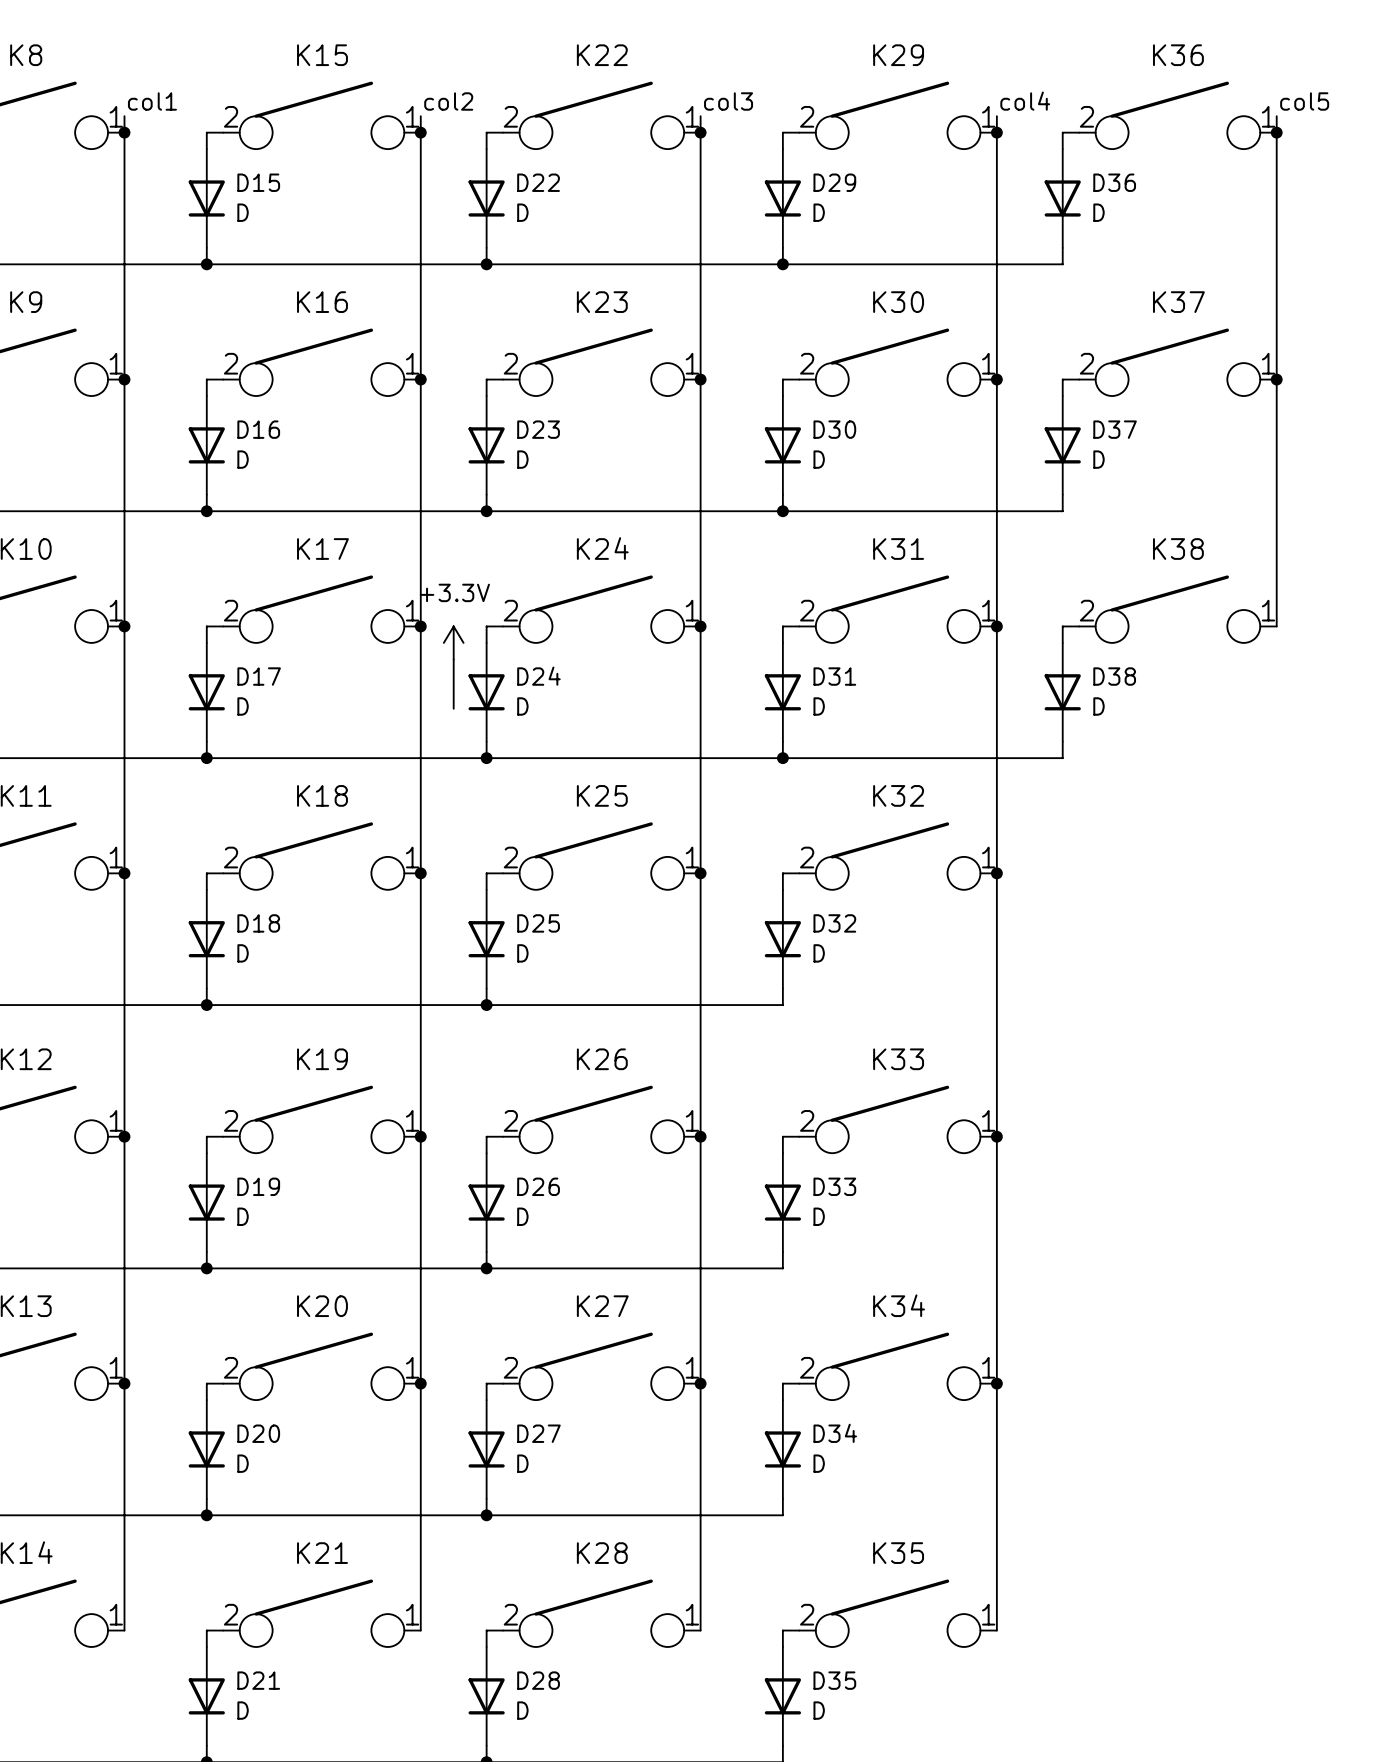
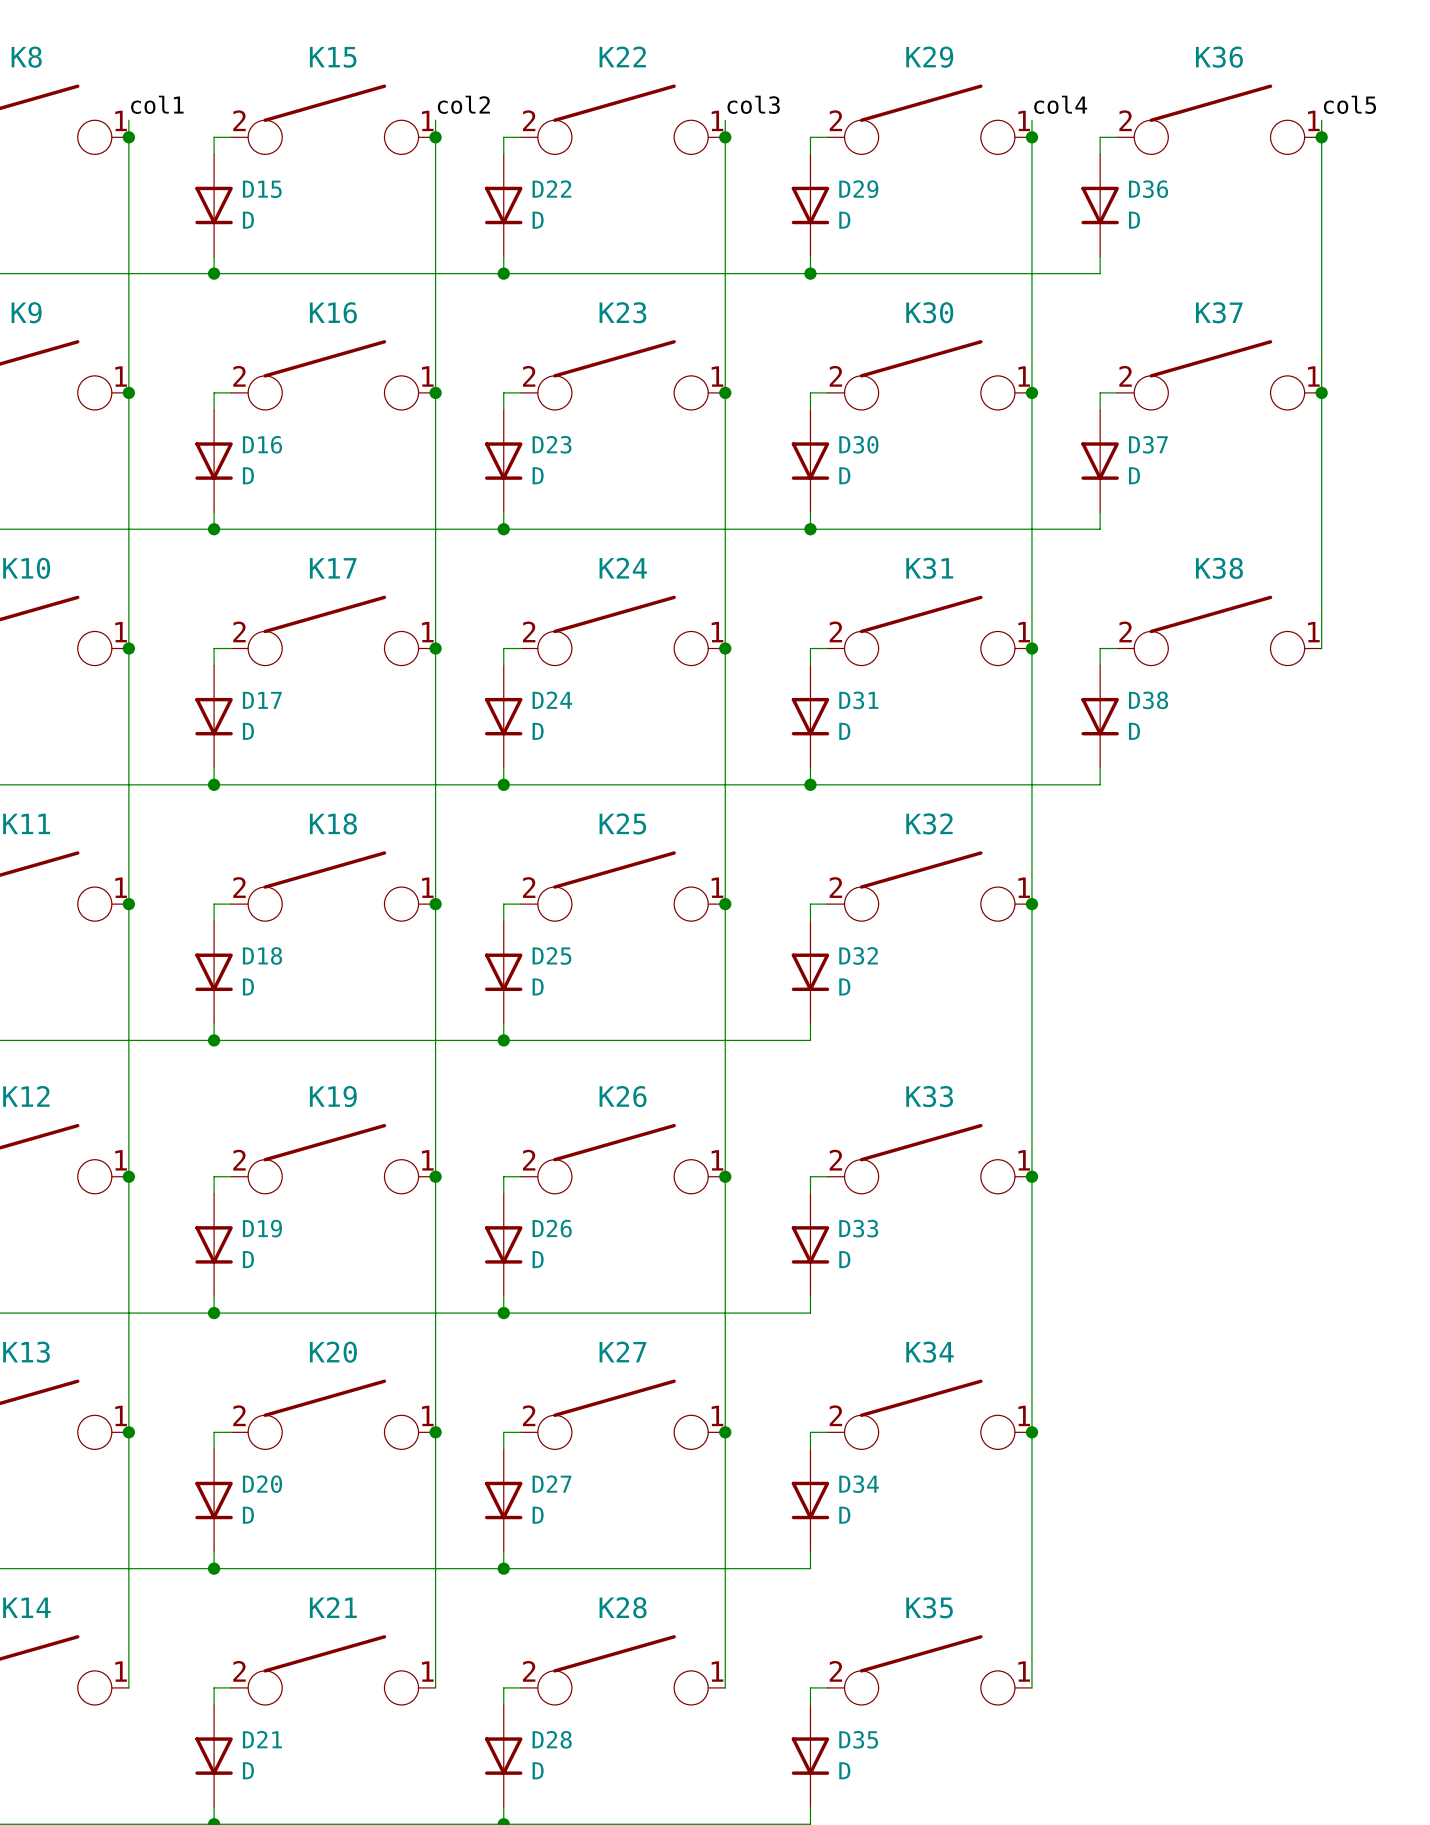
power symbol: +3.3V (453, 642) -> none
wire: (453, 659) (453, 708) -> none

